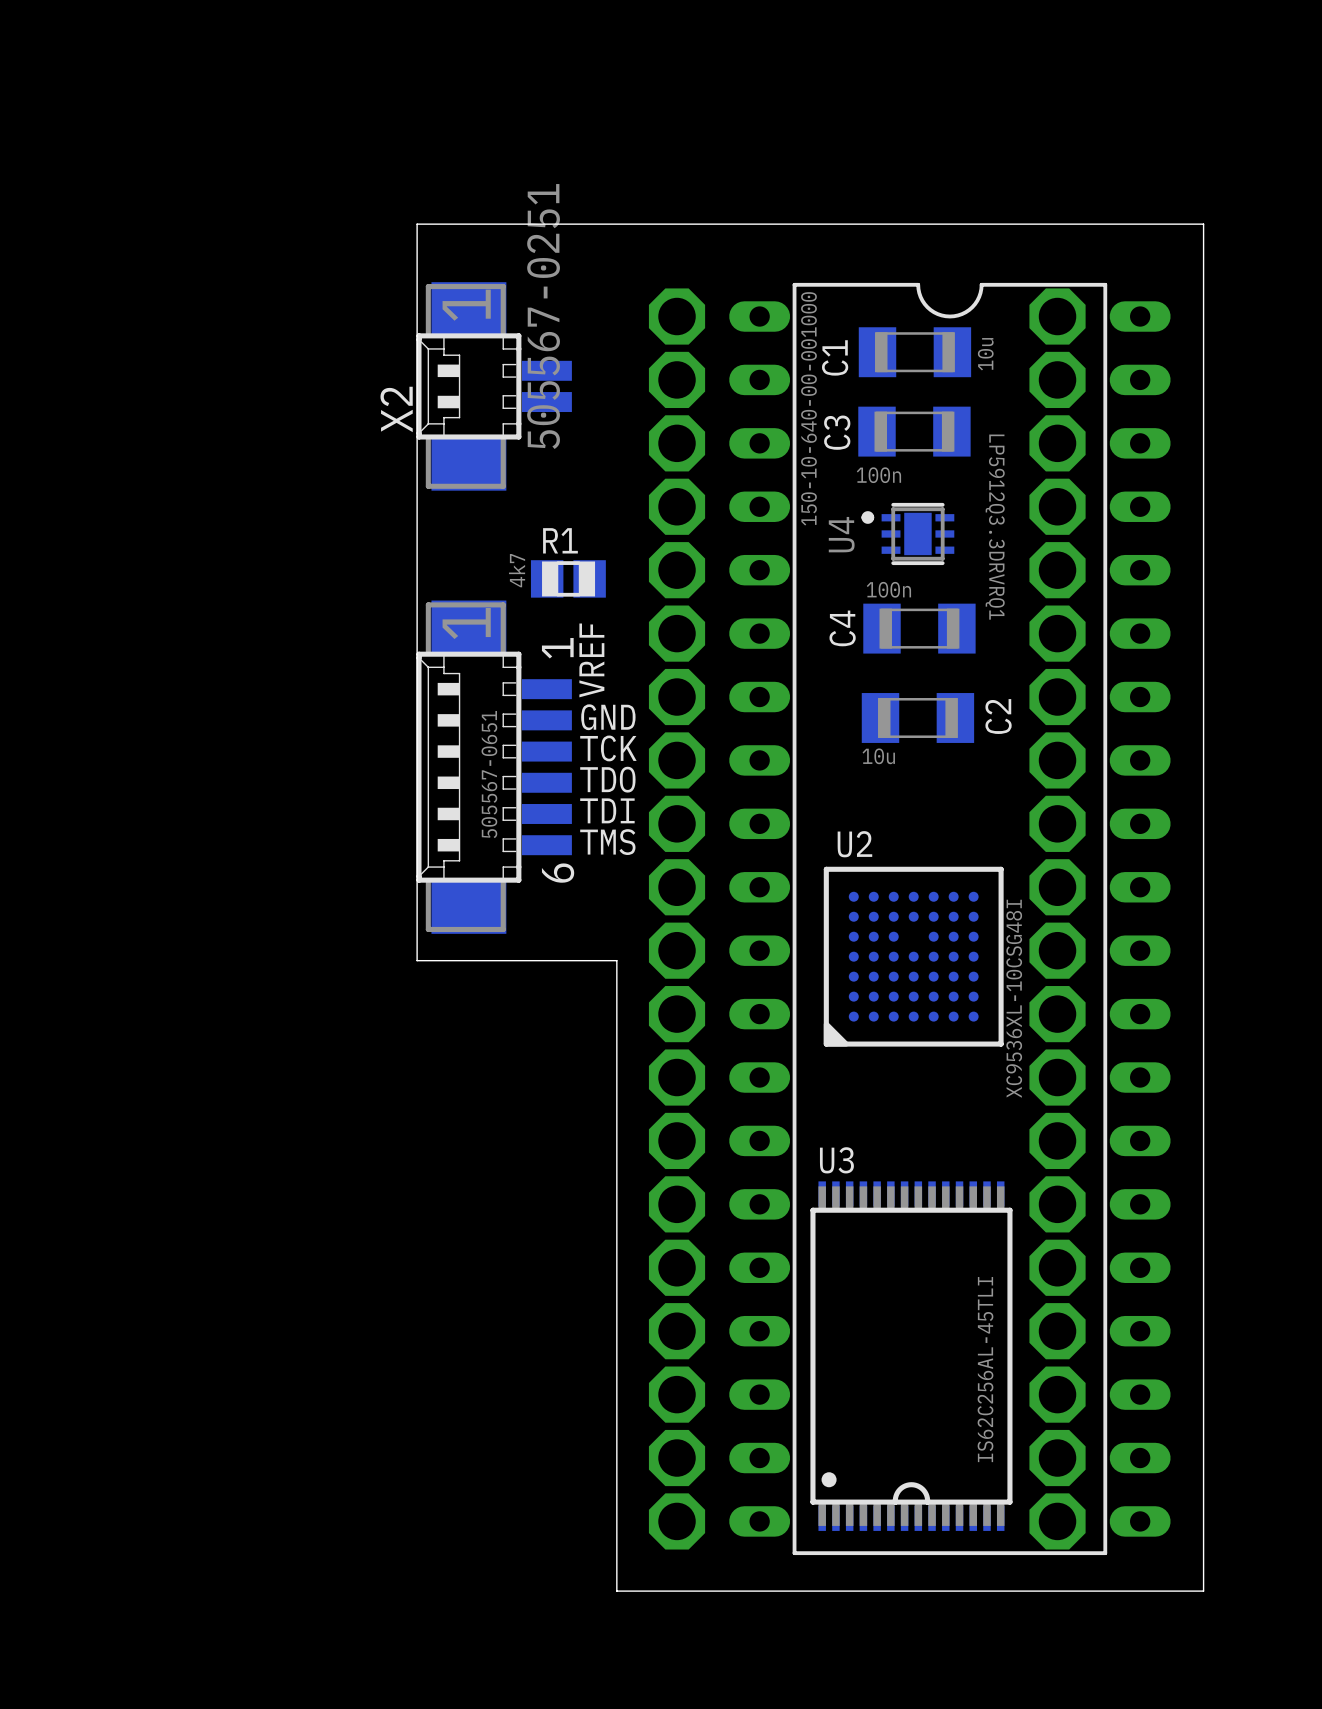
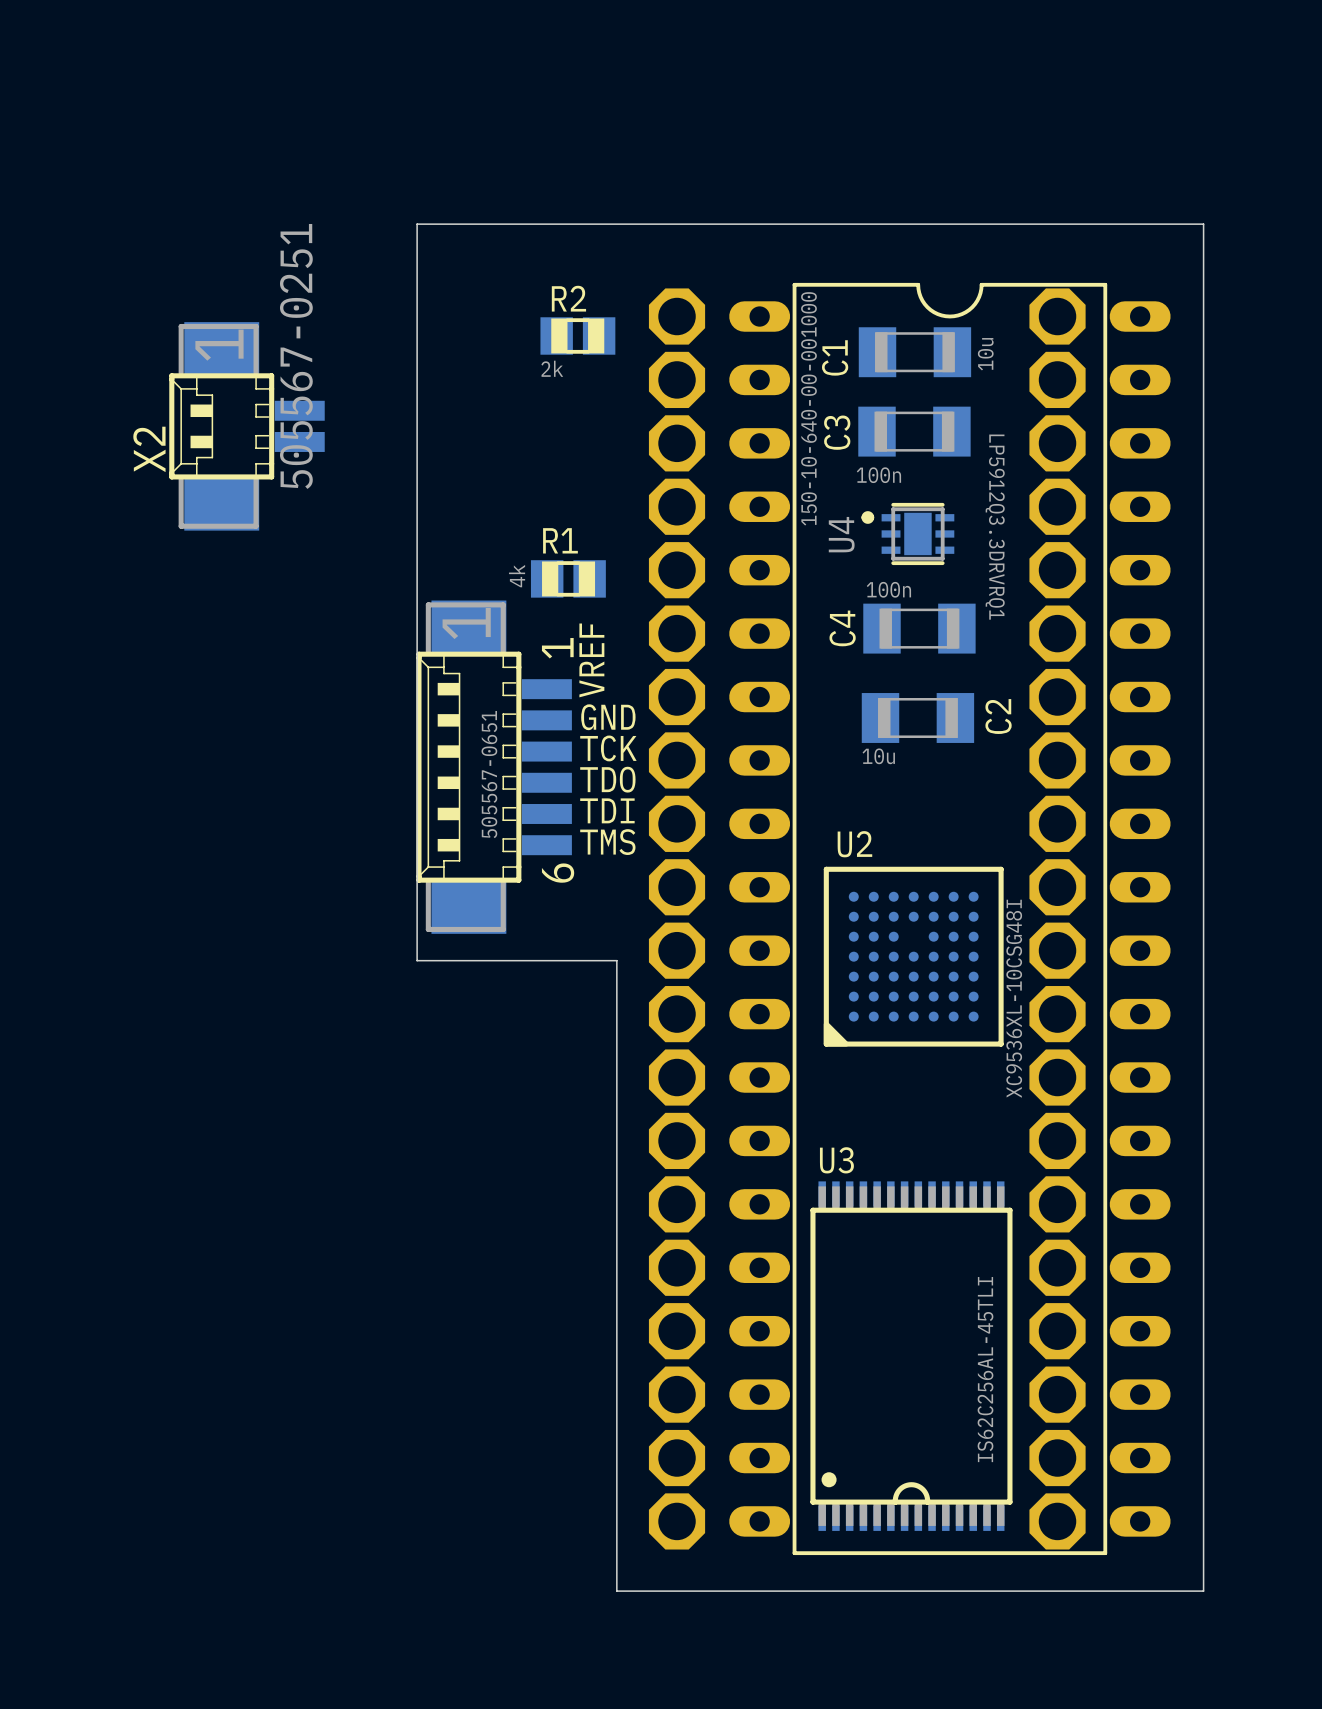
R2: none -> 2k (577, 335)
X2 position: (494, 386) -> (246, 426)
R1 value: 4k7 (517, 570) -> 4k (517, 576)

